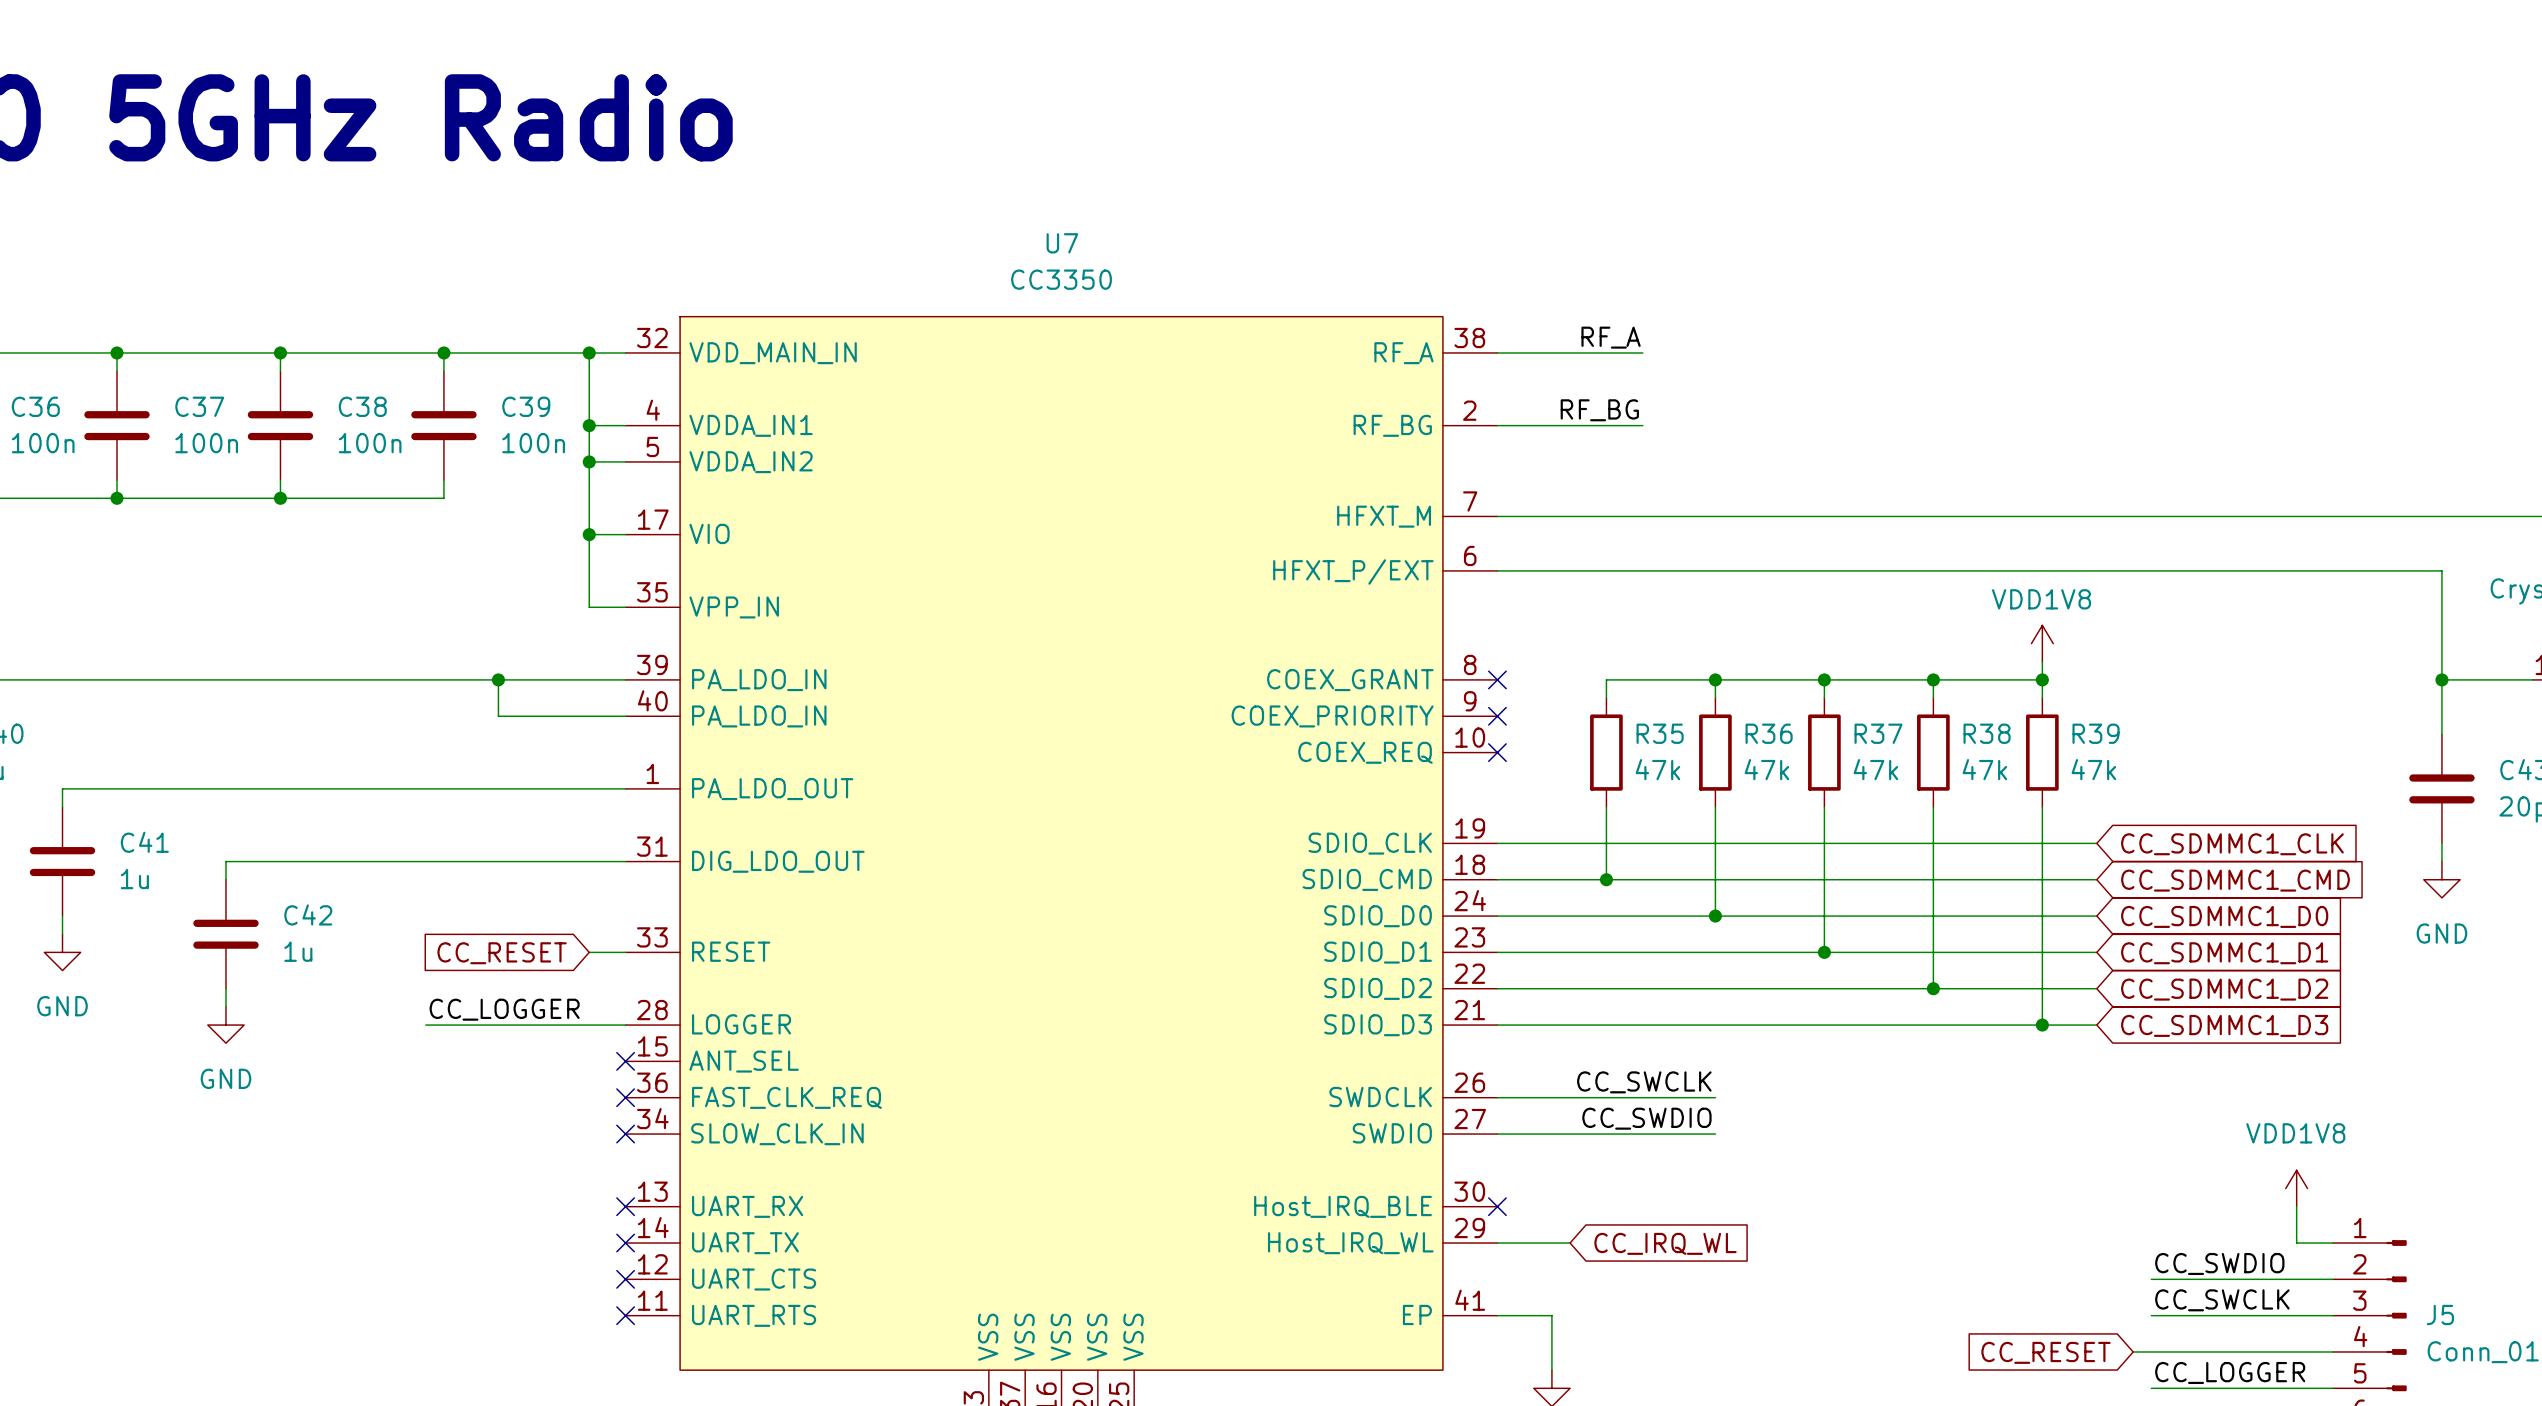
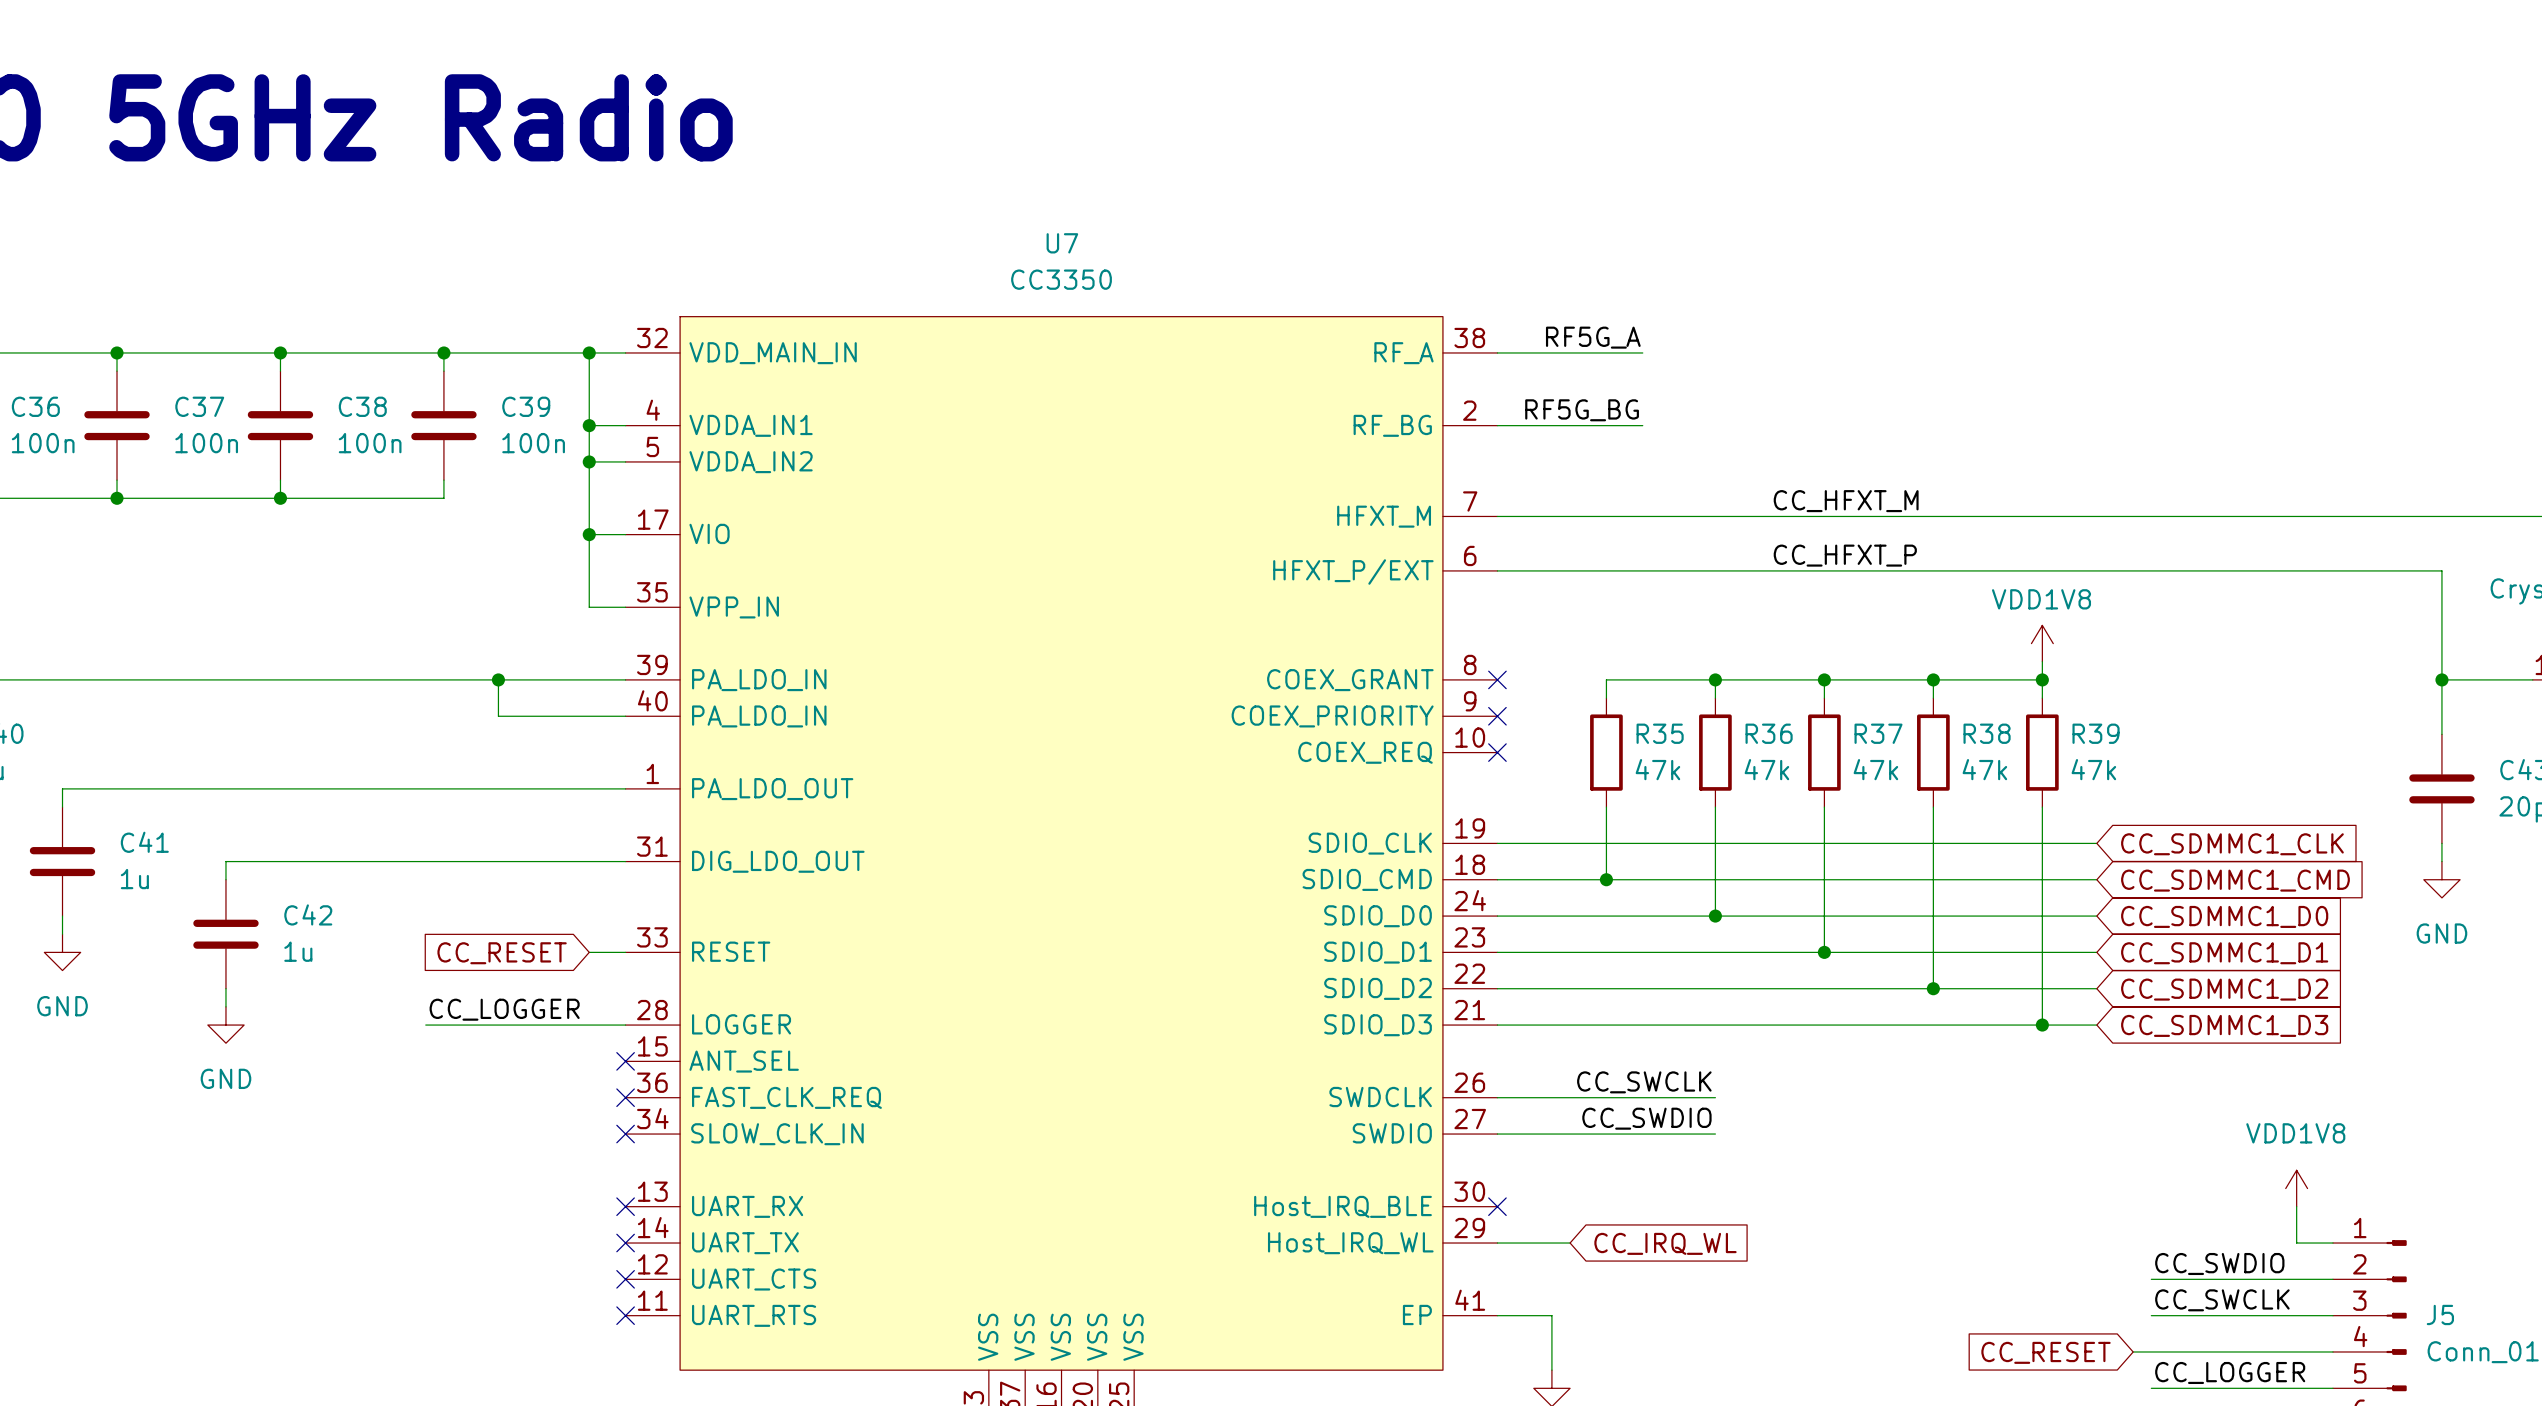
label: RF_A (1611, 337) -> RF5G_A (1593, 337)
label: RF_BG (1599, 410) -> RF5G_BG (1582, 410)
label: none -> CC_HFXT_M (1846, 501)
label: none -> CC_HFXT_P (1845, 555)

